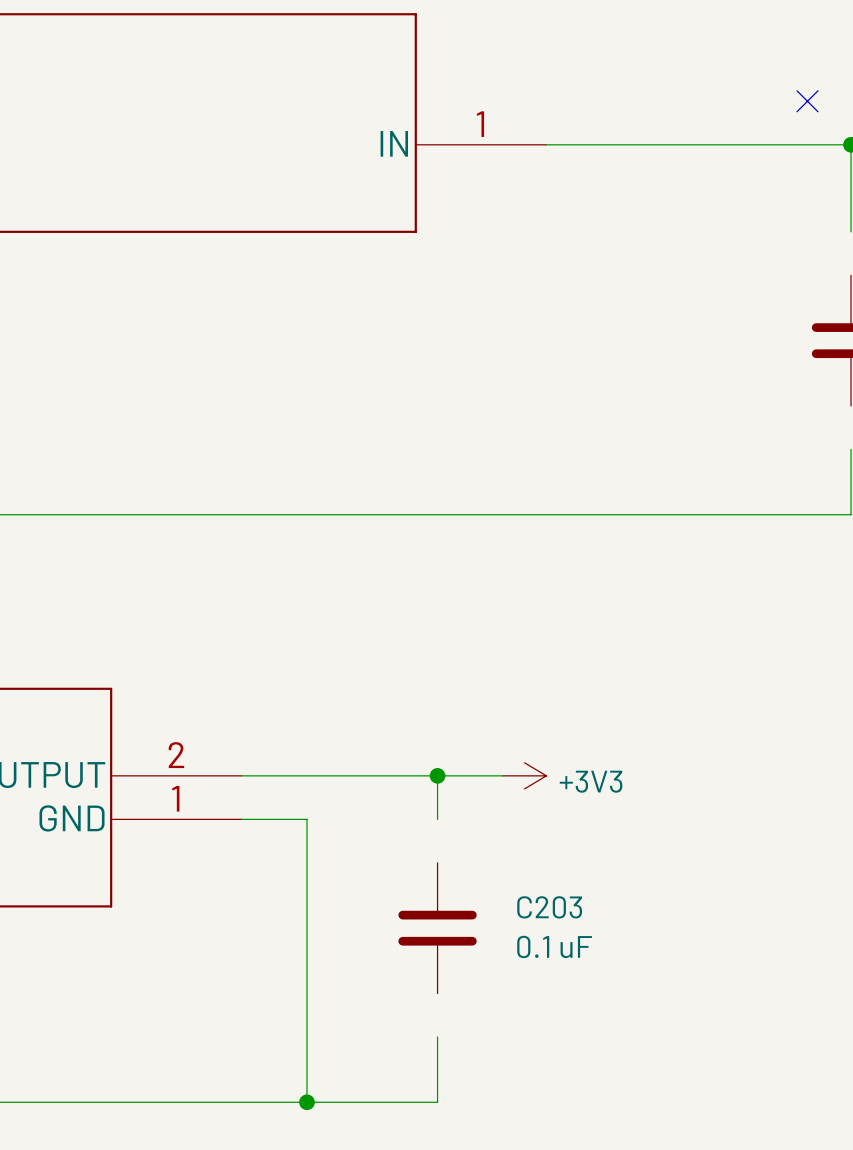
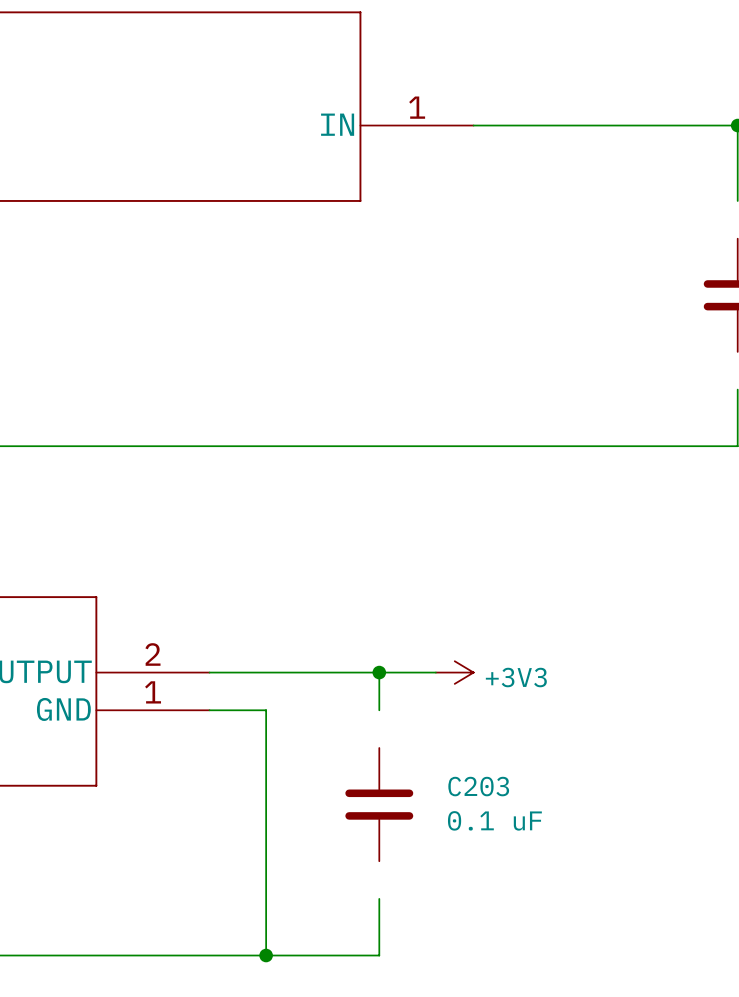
no-connect mark: (807, 101) -> none

